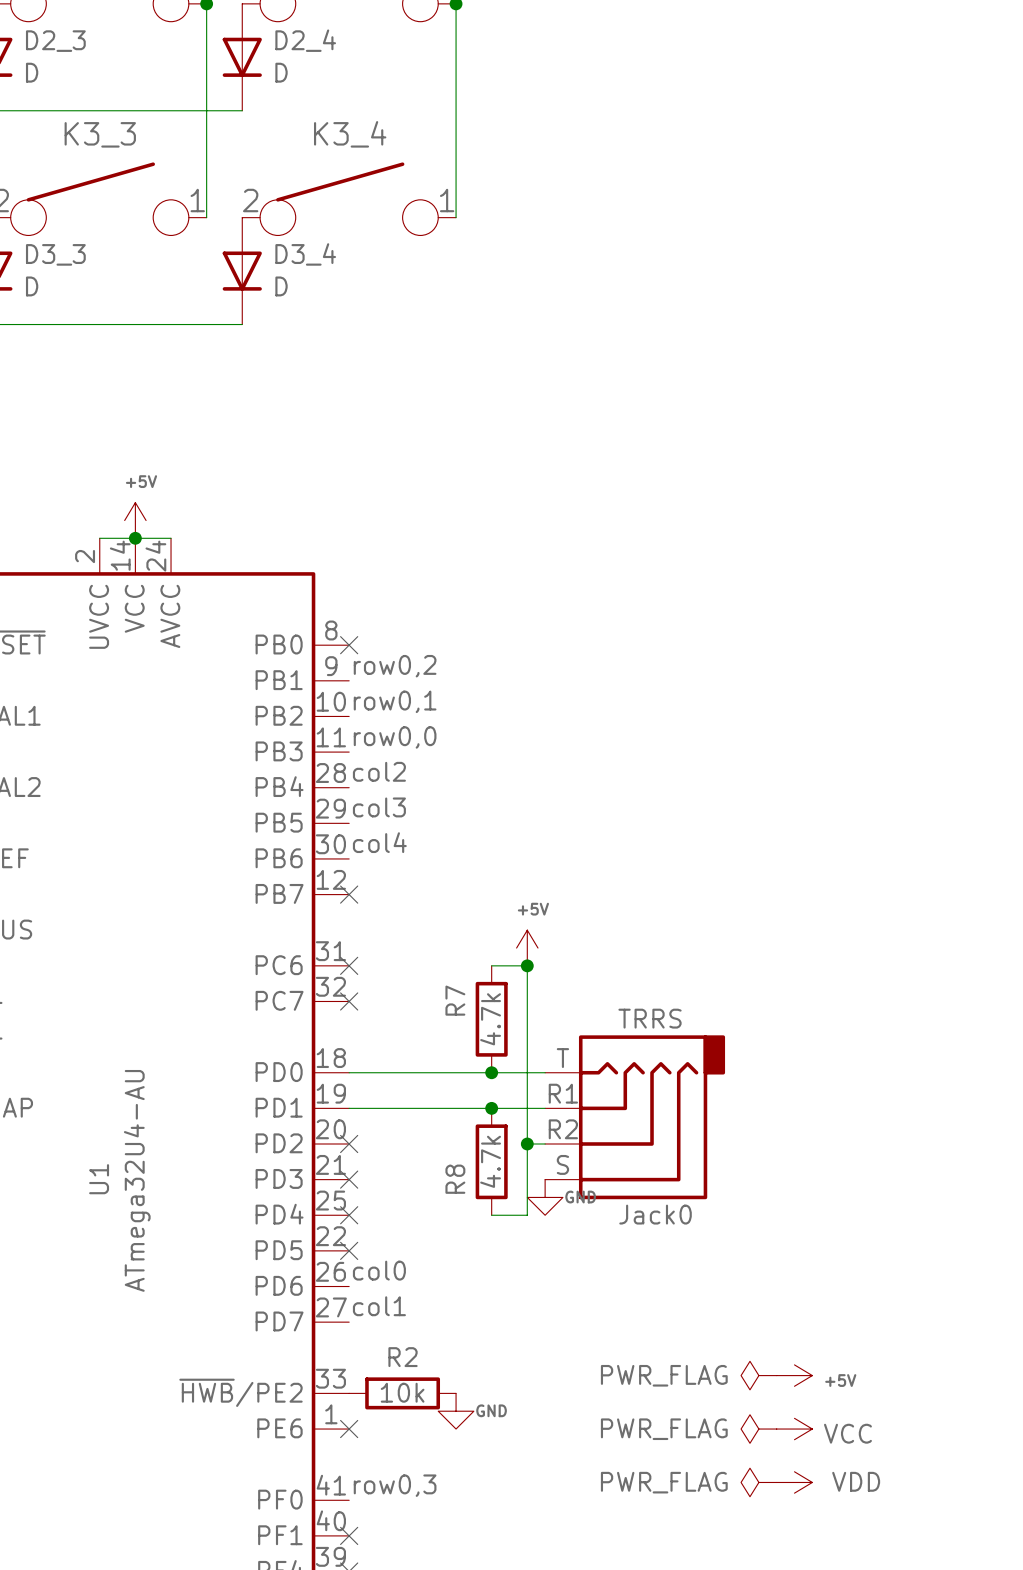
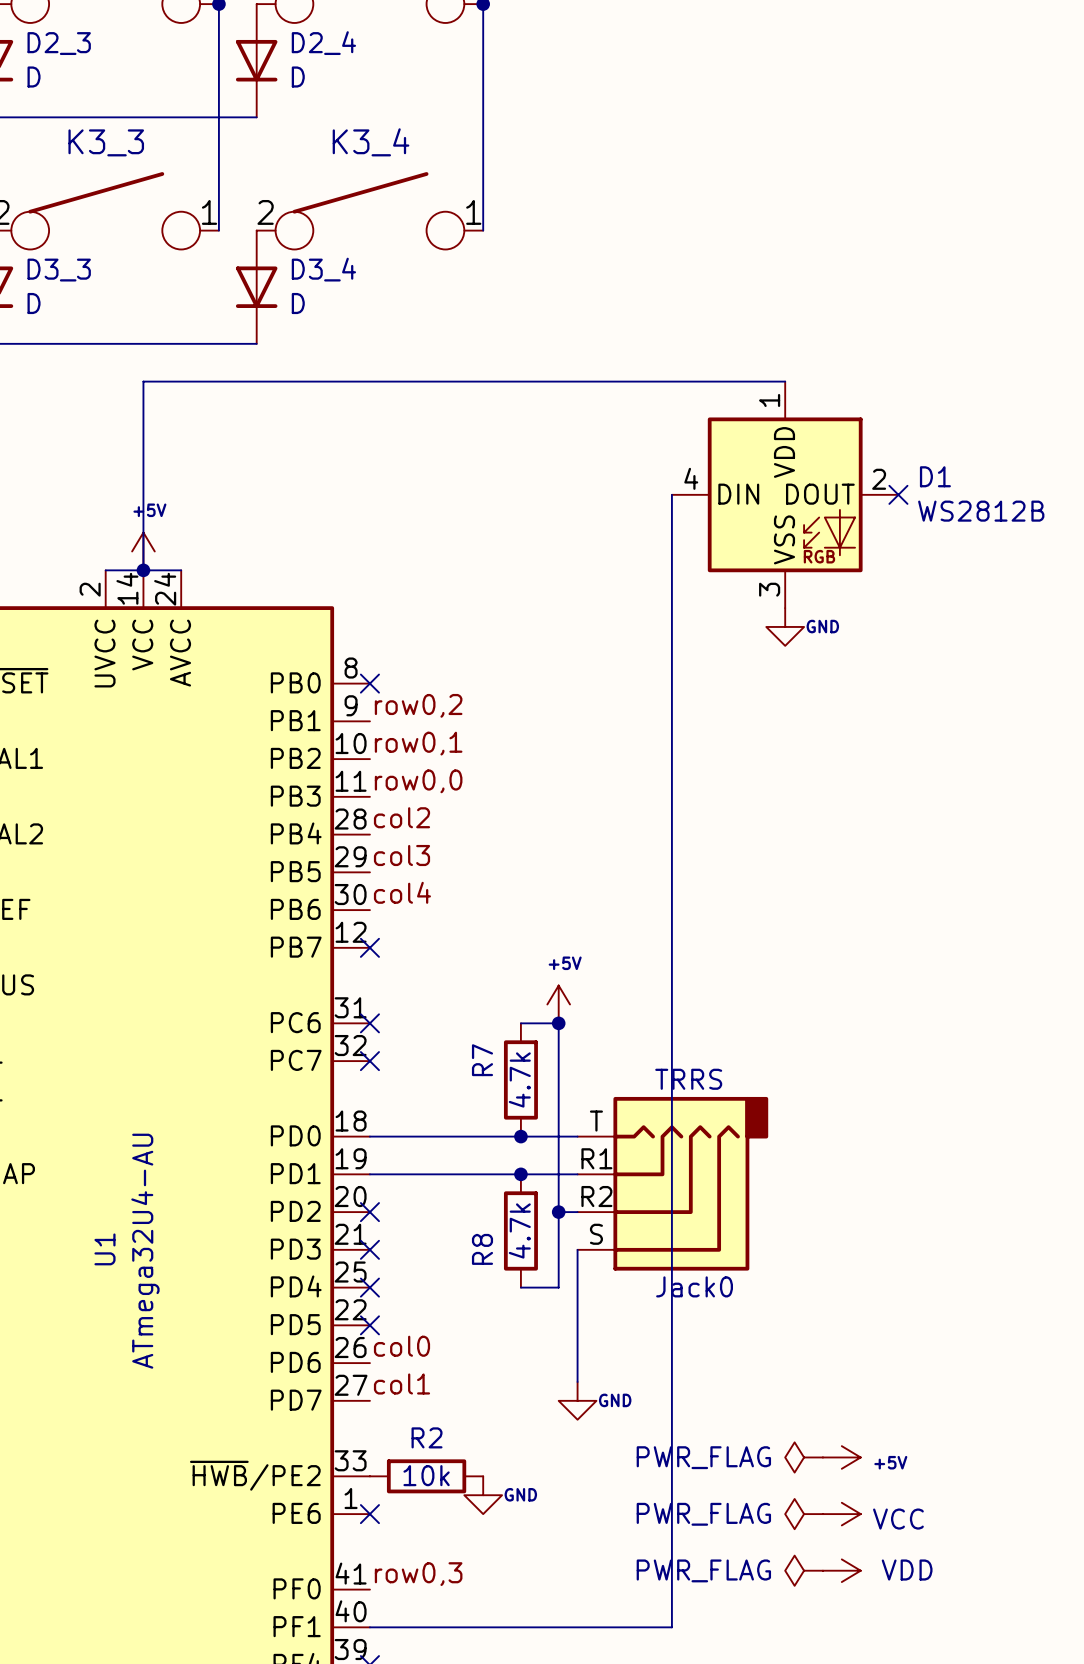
wire: none -> (785, 381) (143, 381) (143, 570)
wire: none -> (671, 494) (671, 1627) (369, 1627)
D1: none -> WS2812B (785, 494)
no-connect mark: none -> (898, 494)
power symbol: none -> GND (785, 626)
wire: none -> (577, 1249) (577, 1381)
power symbol position: GND (545, 1197) -> GND (577, 1400)
no-connect mark: (349, 1535) -> none

